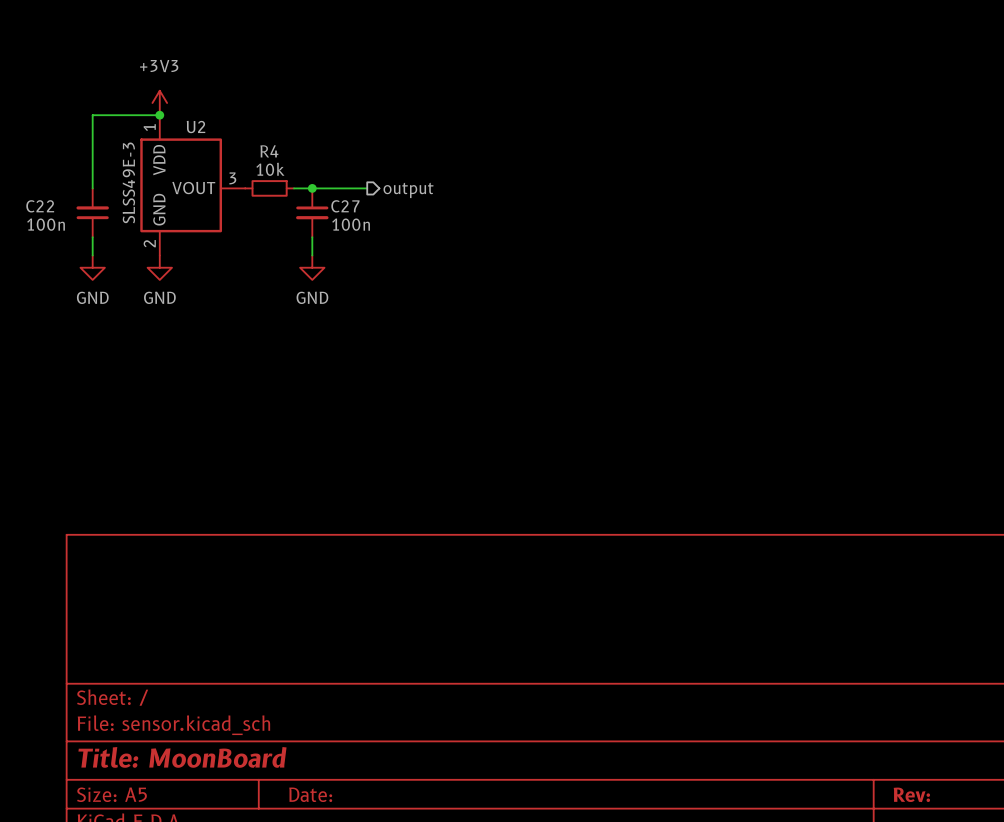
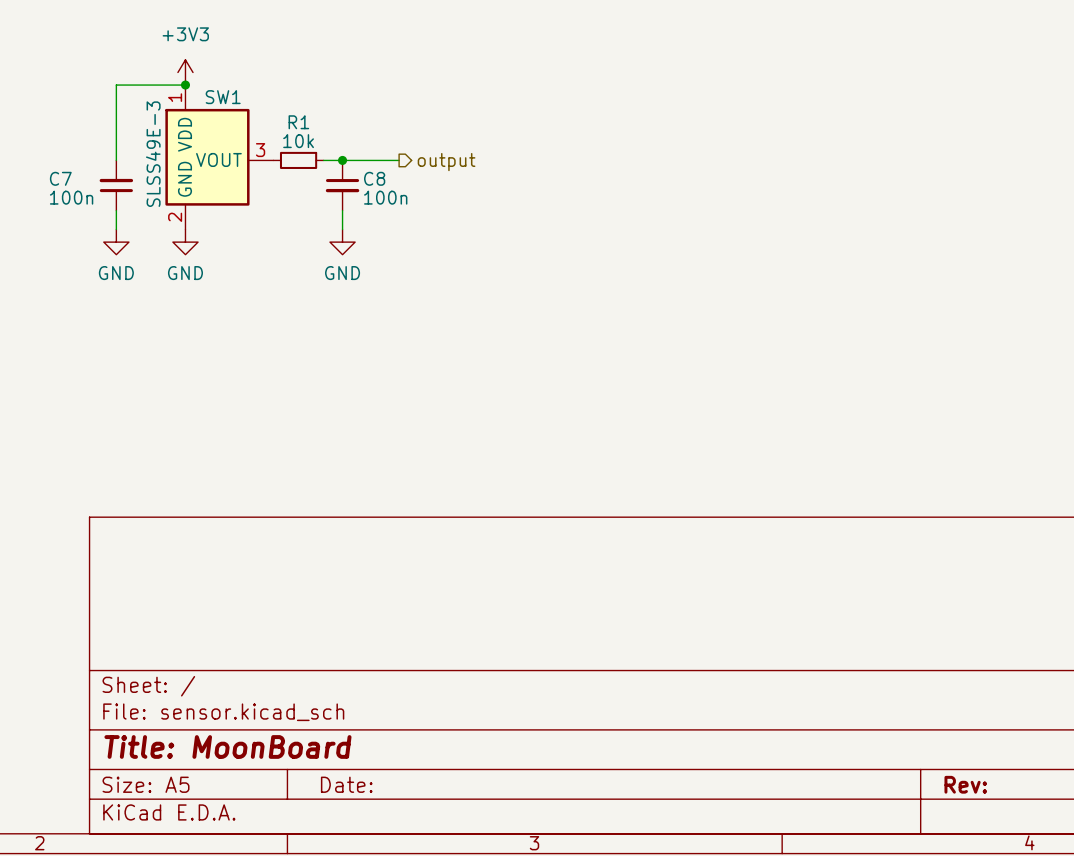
U2 name: U2 (196, 127) -> SW1 (223, 97)
R4 name: R4 (269, 151) -> R1 (298, 122)
C22 name: C22 (40, 206) -> C7 (60, 178)
C27 name: C27 (345, 206) -> C8 (374, 178)

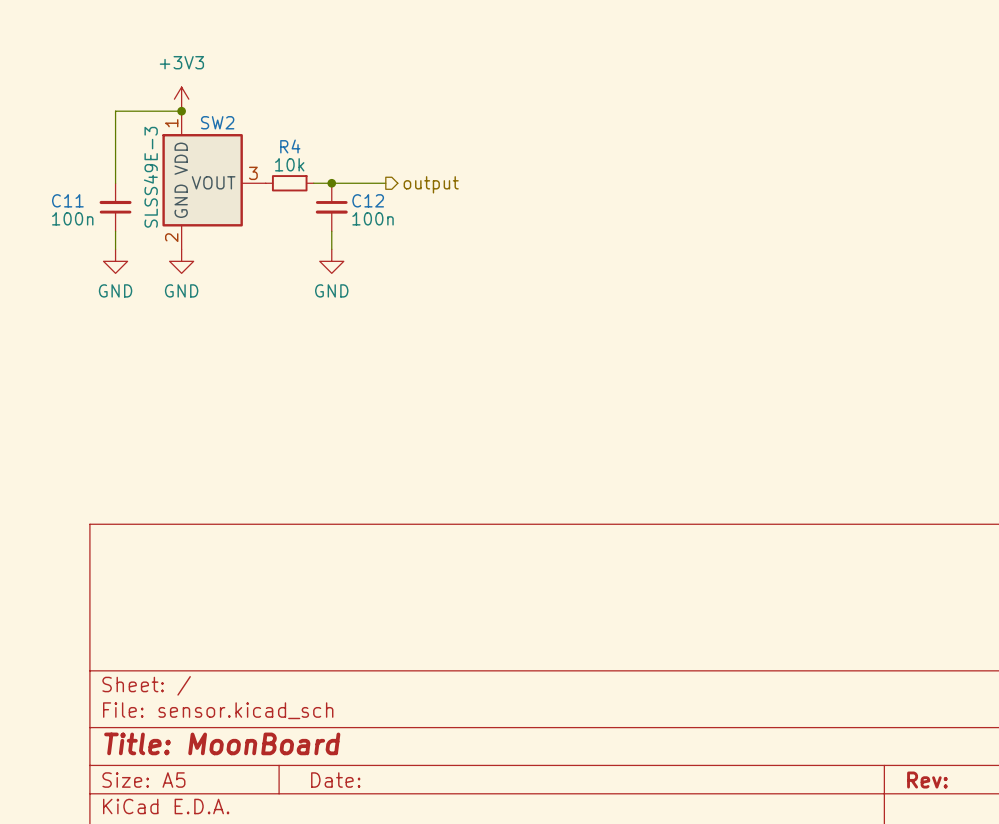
SW1 name: SW1 (223, 97) -> SW2 (217, 122)
R1 name: R1 (298, 122) -> R4 (290, 146)
C7 name: C7 (60, 178) -> C11 (67, 200)
C8 name: C8 (374, 178) -> C12 (368, 200)

